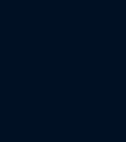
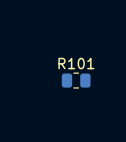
R101: none -> (76, 80)

